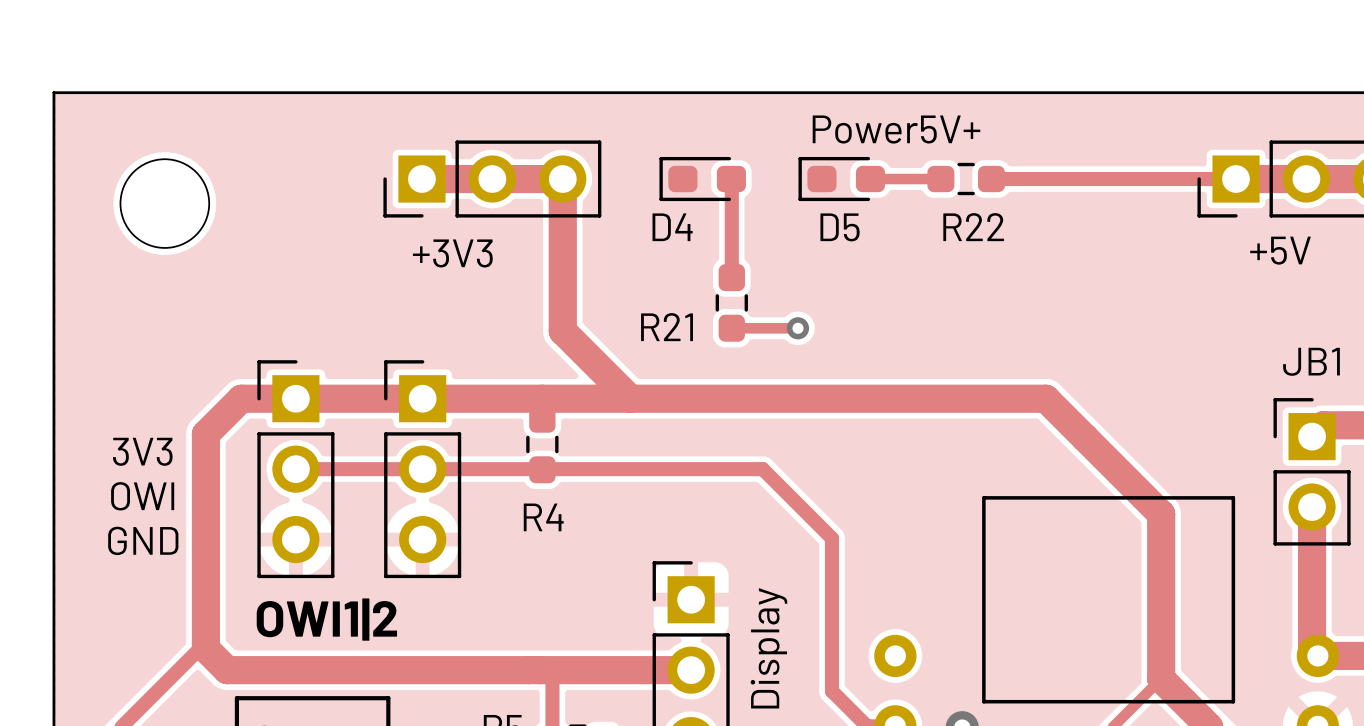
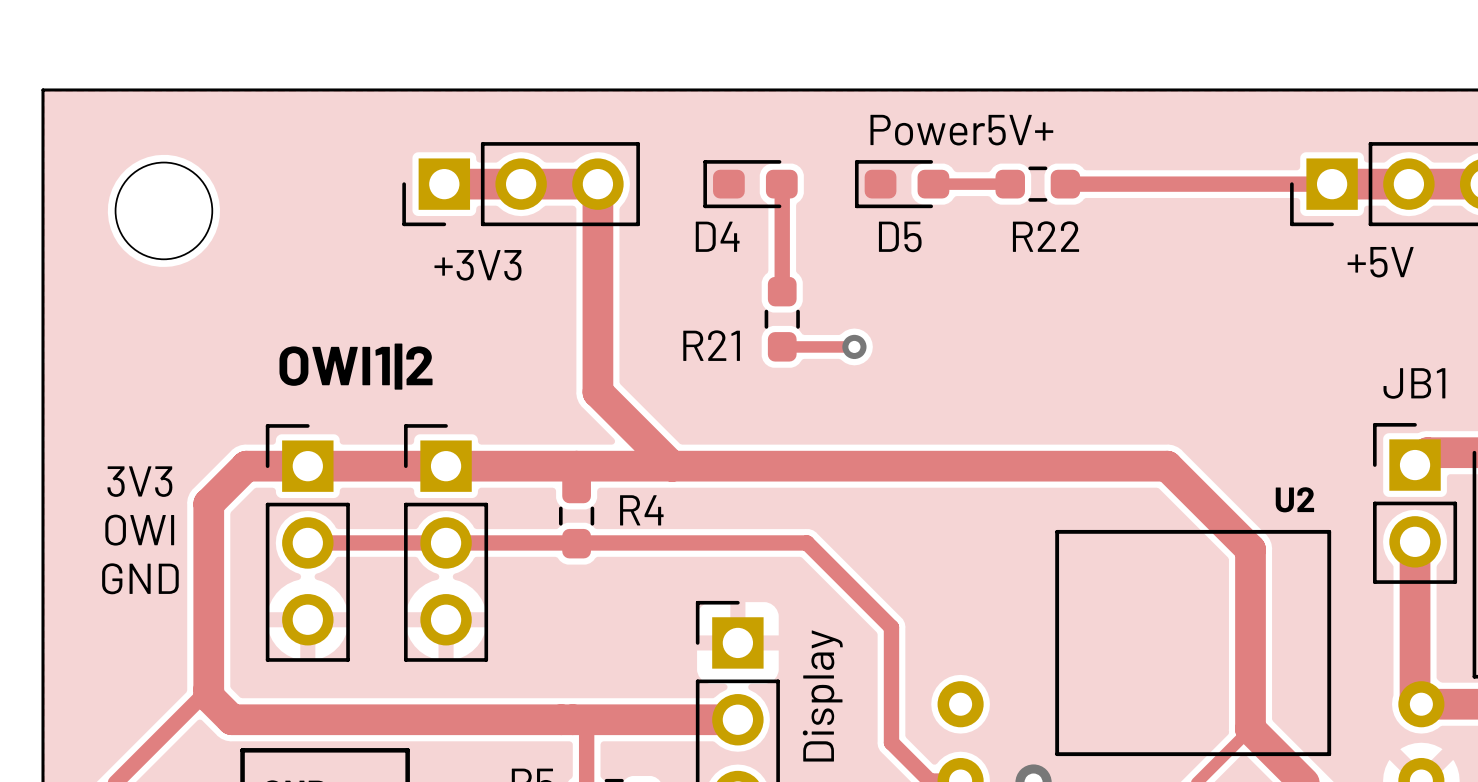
track: (562, 331) (630, 398) (1045, 398) (1084, 437) -> (208, 503) (246, 466) (1167, 466)
track: none -> (597, 350) (597, 392) (671, 466)
track: (629, 398) (241, 398) (205, 434) (205, 472) -> none
R4 position: (542, 444) -> (576, 516)
U2 name: none -> U2 (1294, 499)
track: (295, 469) (762, 469) (831, 538) (831, 585) -> (307, 542) (806, 542) (891, 627)
part position: (295, 469) -> (307, 542)
part position: (422, 469) -> (446, 542)
R4 name position: R4 (543, 517) -> R4 (641, 510)
text position: OWI1|2 (326, 619) -> OWI1|2 (356, 366)

